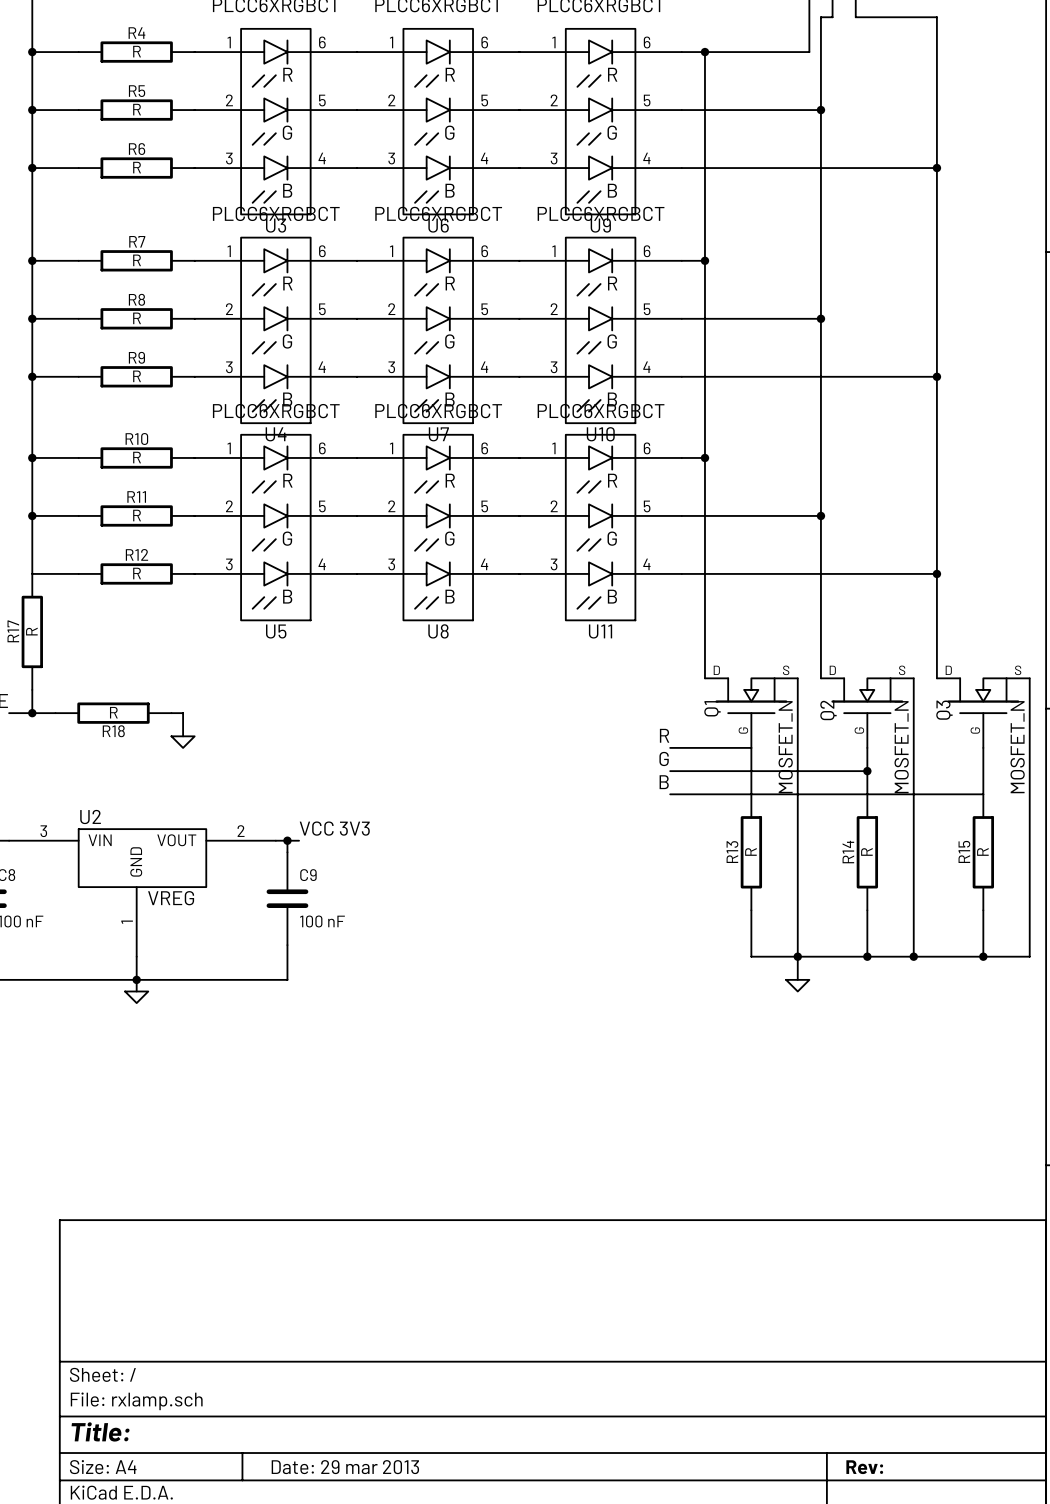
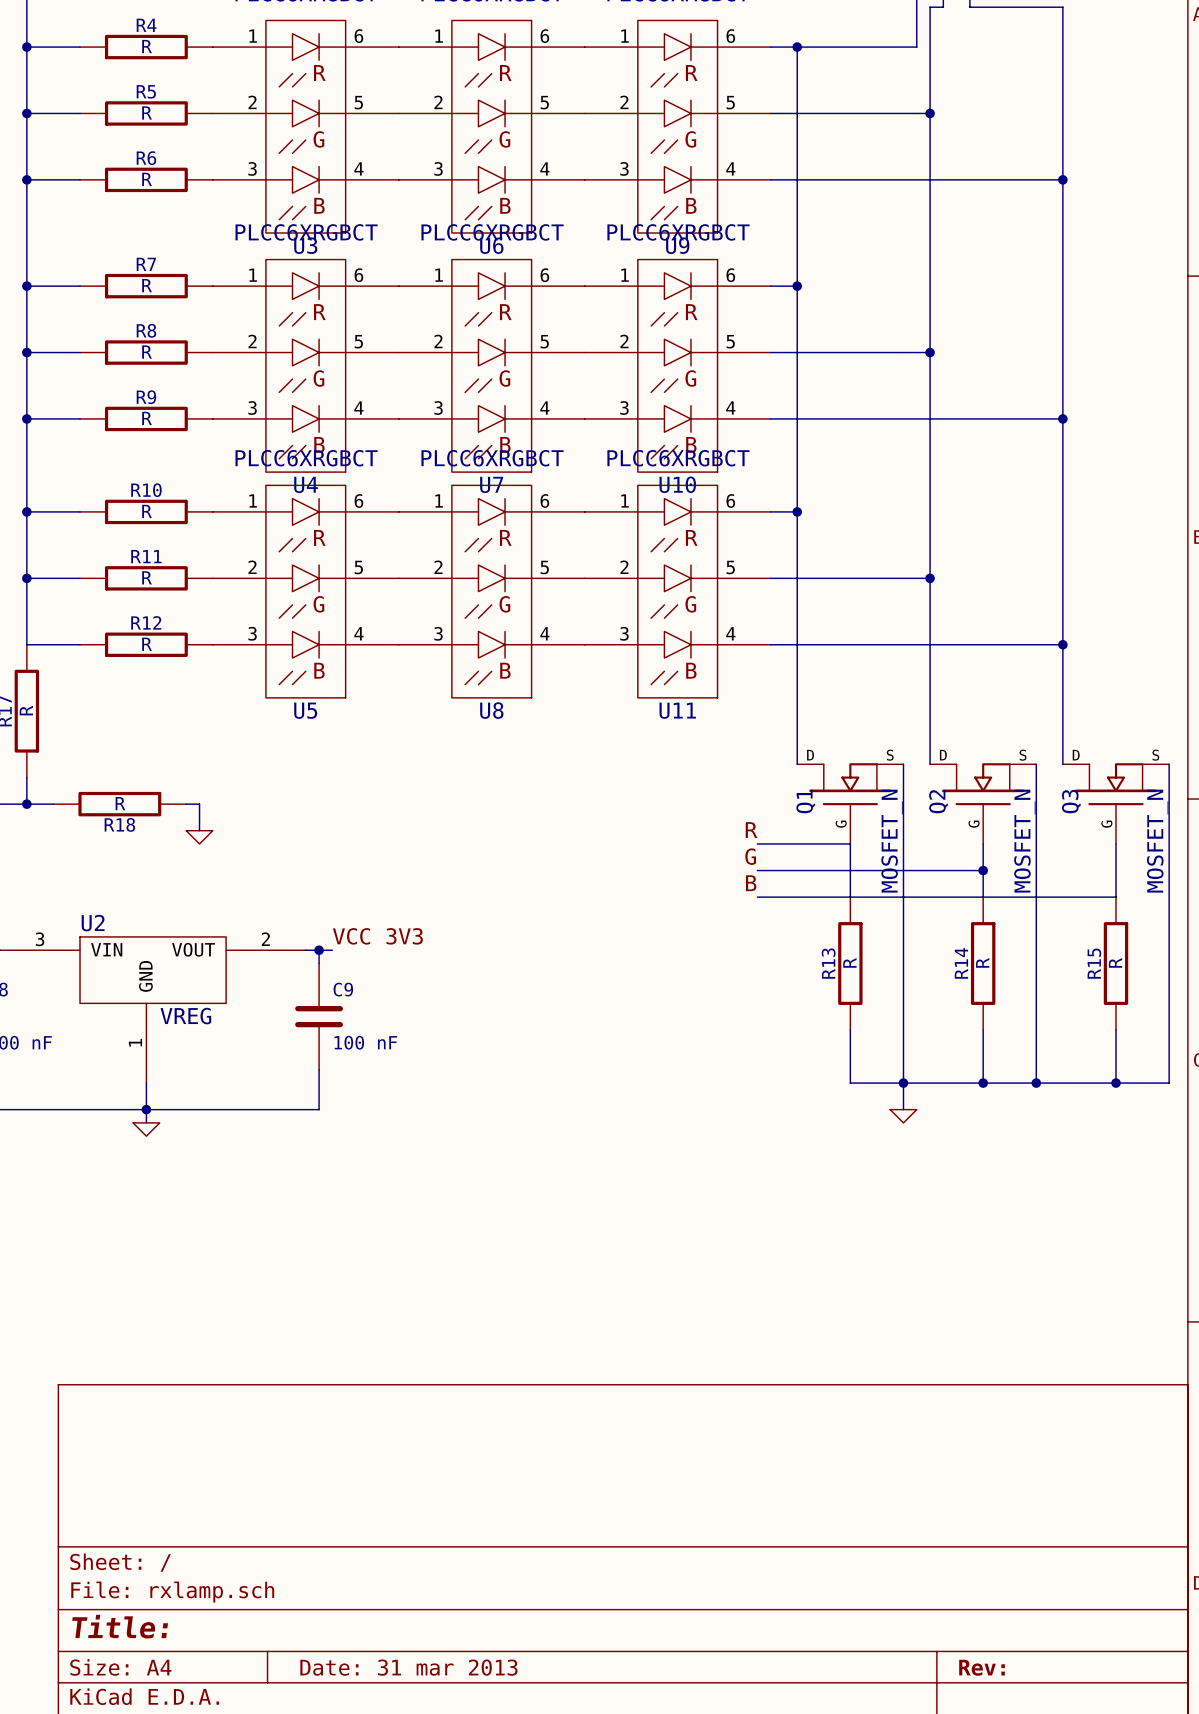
title block: Date: 29 mar 2013 (345, 1467) -> Date: 31 mar 2013 (408, 1667)

